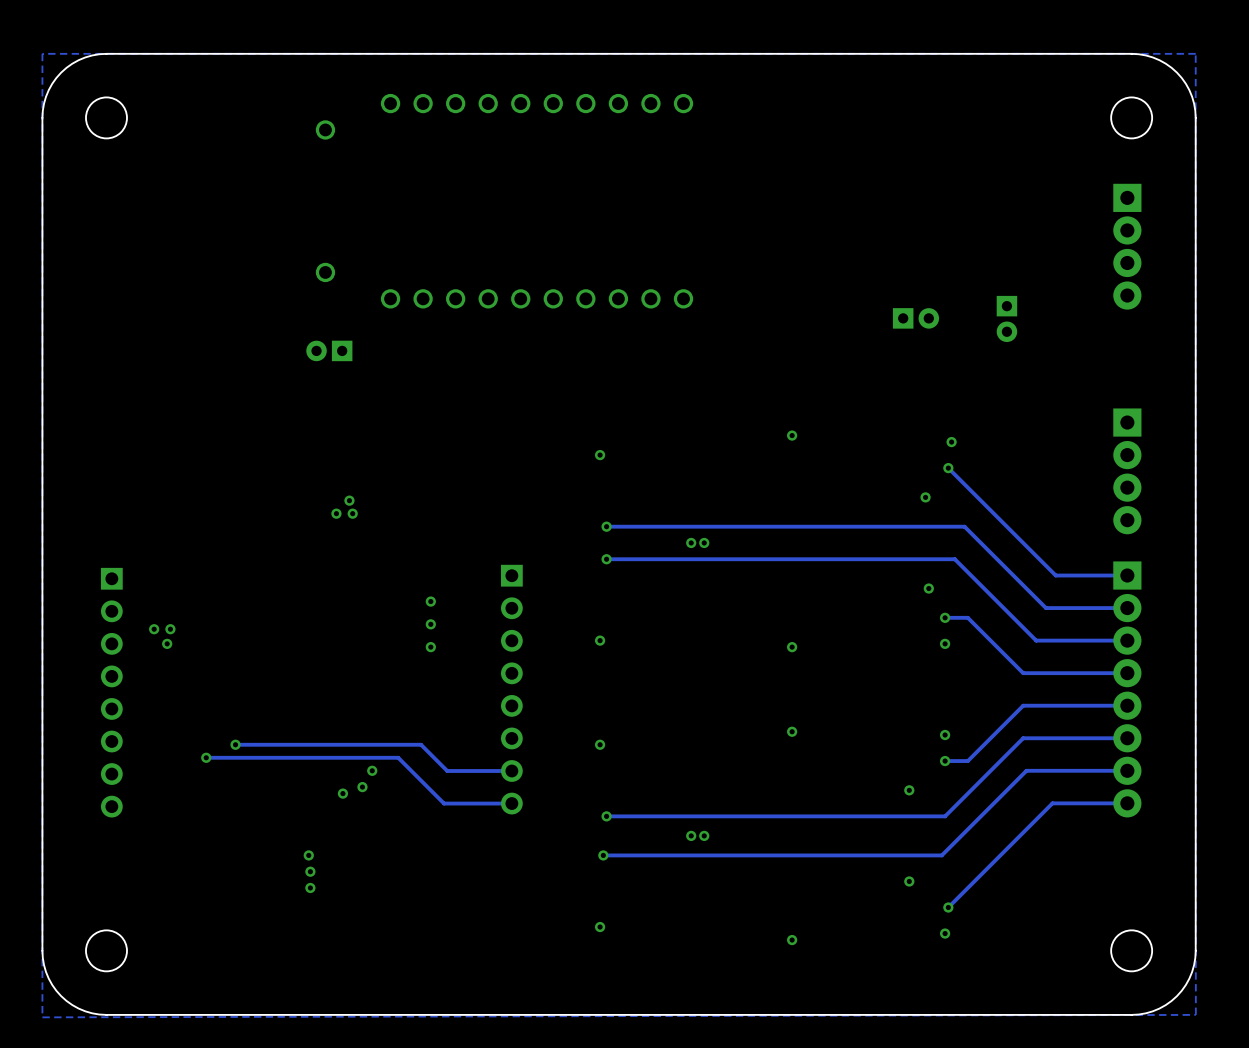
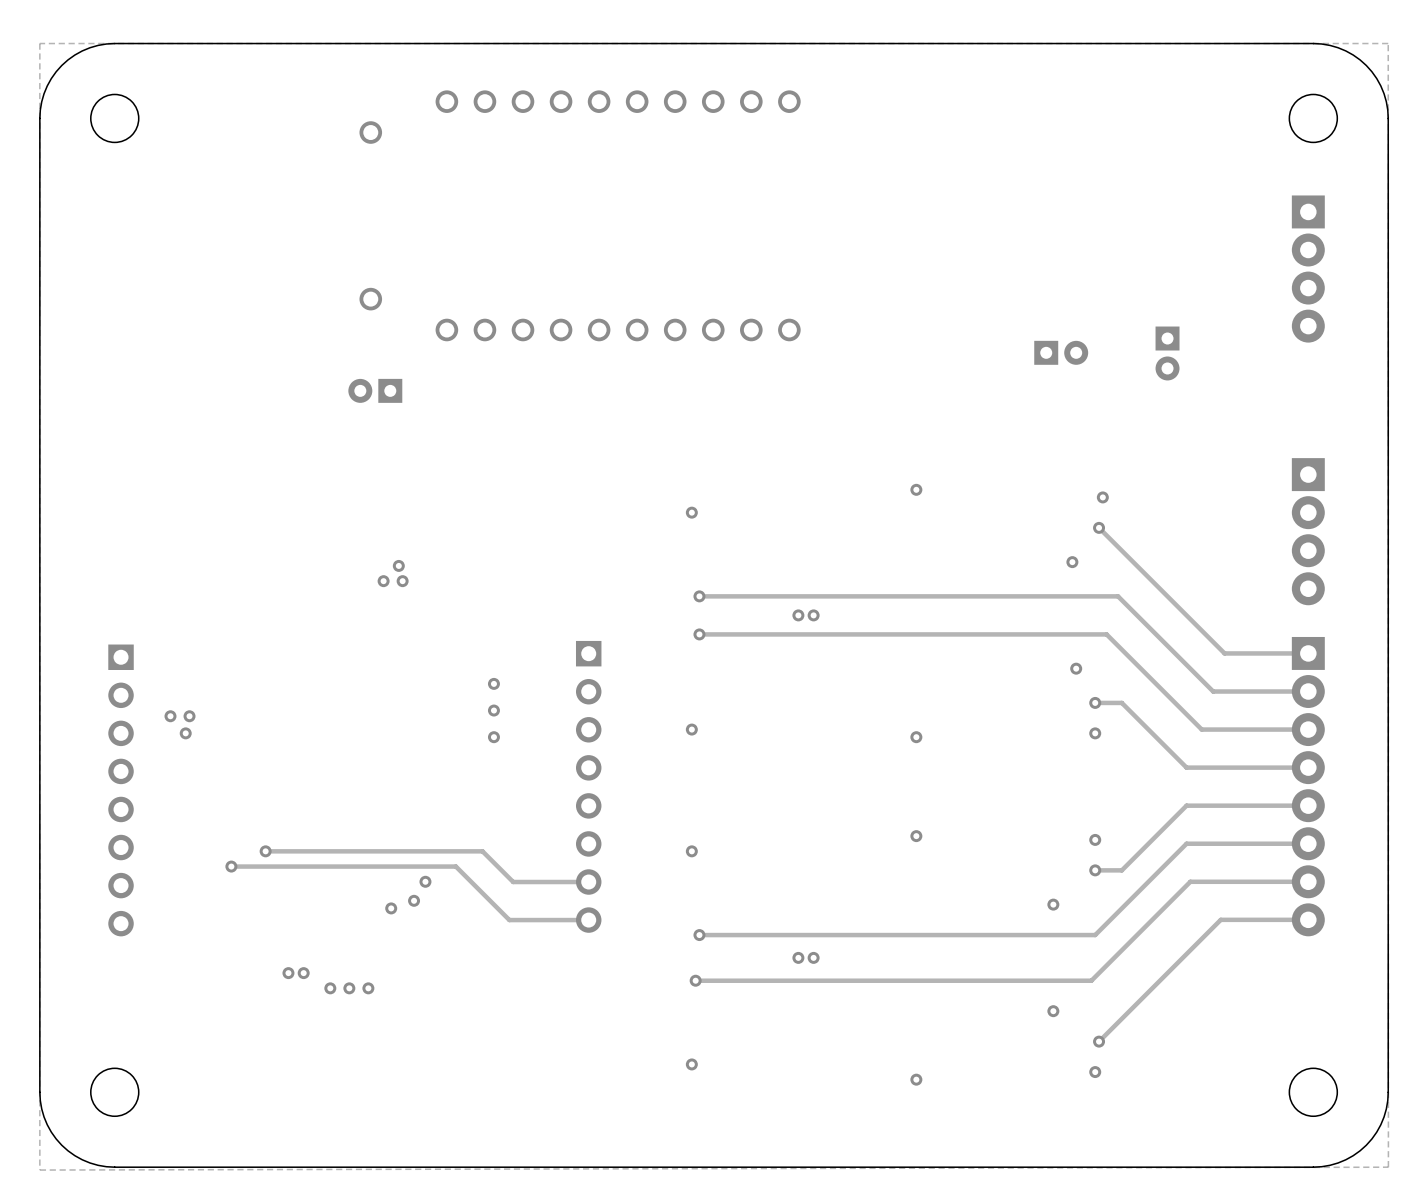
via: none -> (288, 973)
via: none -> (303, 973)
via: (308, 855) -> none
via: none -> (330, 988)
via: none -> (349, 988)
via: none -> (368, 988)
via: (310, 871) -> none
via: (310, 887) -> none

